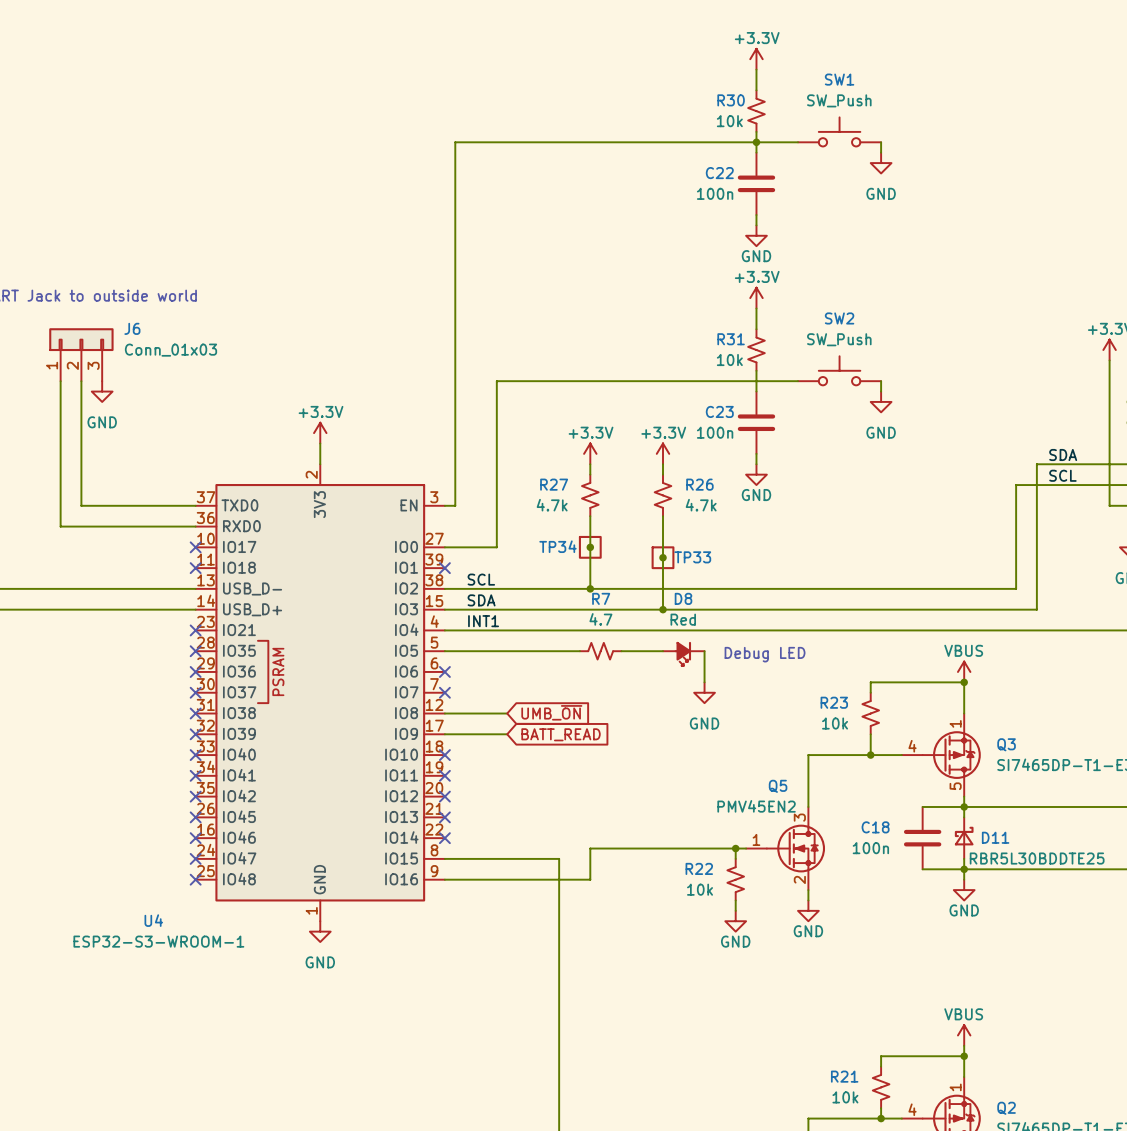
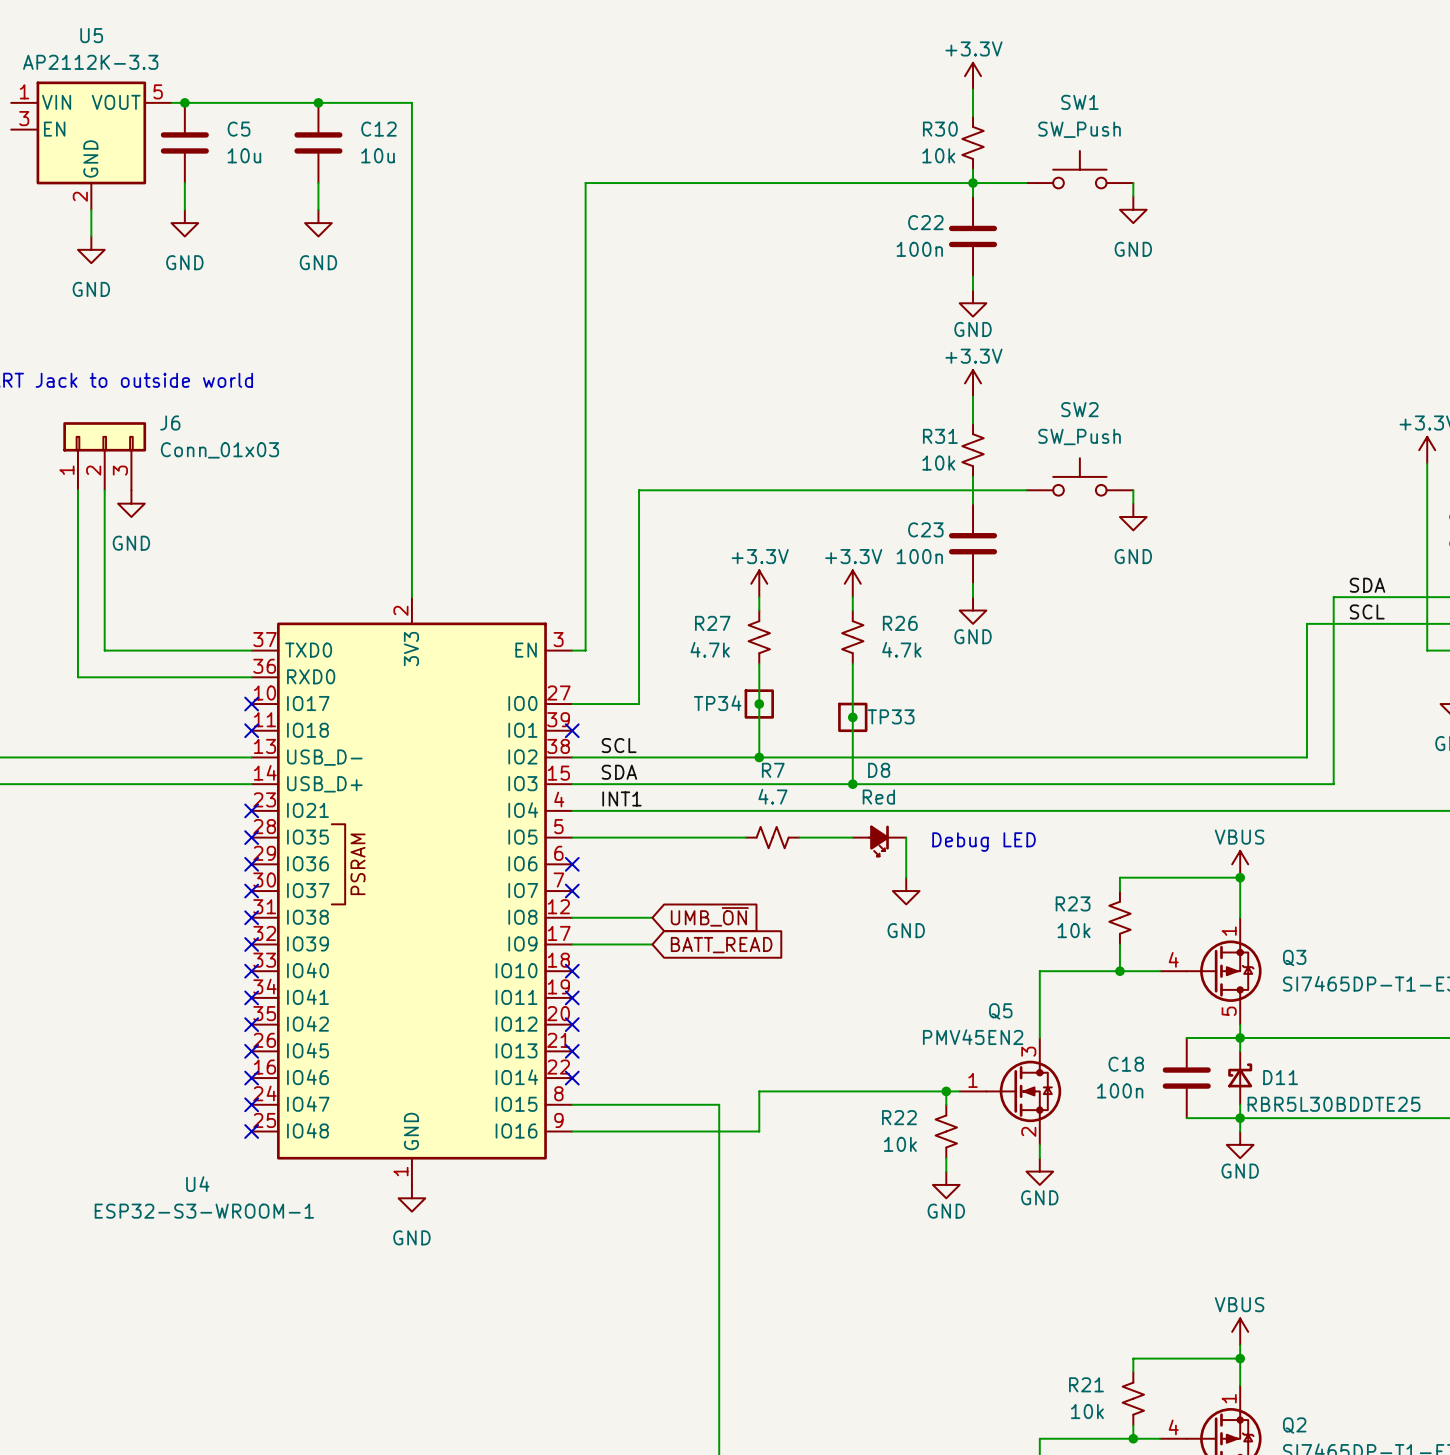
wire: none -> (171, 102) (411, 102) (411, 570)
junction: none -> (184, 102)
junction: none -> (318, 102)
C5: none -> 10u (184, 142)
C12: none -> 10u (318, 142)
U5: none -> AP2112K-3.3 (91, 145)
wire: none -> (184, 183) (184, 209)
wire: none -> (318, 183) (318, 209)
wire: none -> (91, 209) (91, 236)
power symbol: none -> GND (184, 223)
power symbol: none -> GND (318, 223)
power symbol: none -> GND (91, 249)
power symbol: +3.3V (320, 433) -> none

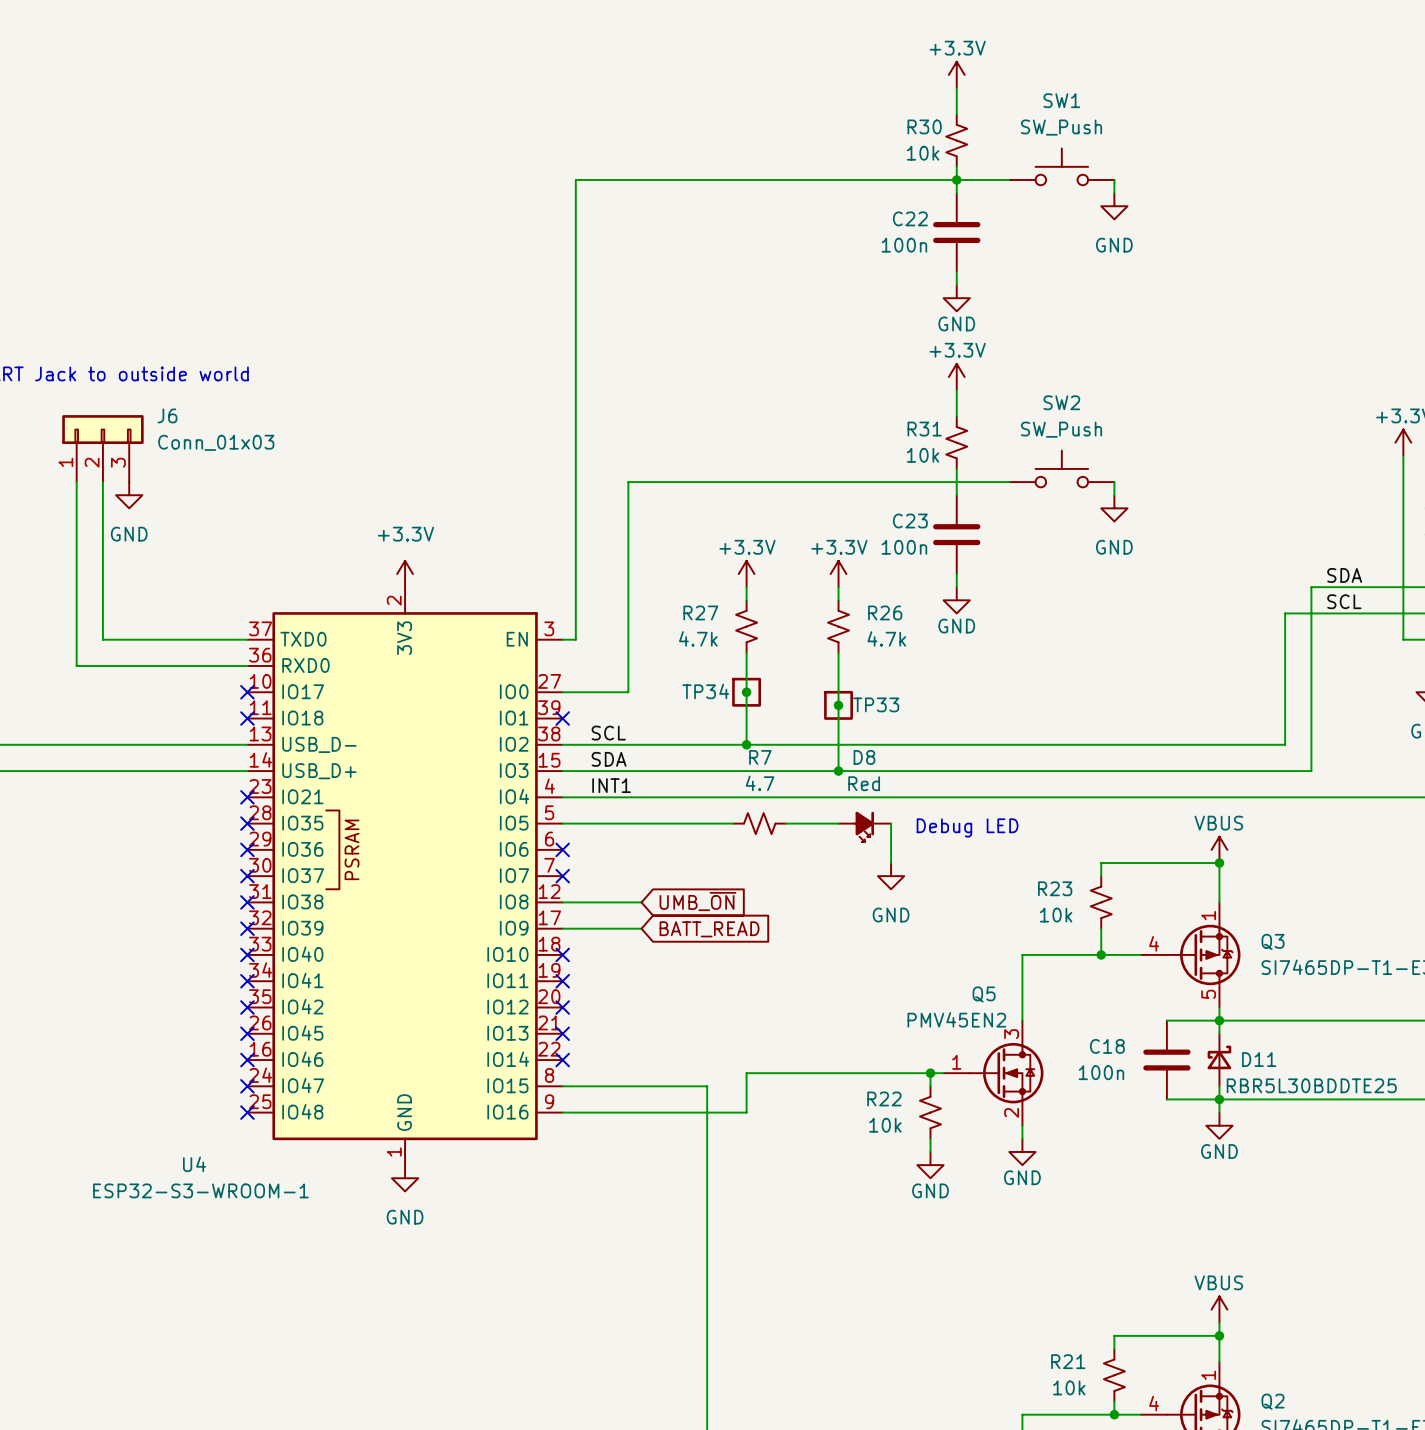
wire: (171, 102) (411, 102) (411, 597) -> none
junction: (184, 102) -> none
junction: (318, 102) -> none
C5: 10u (184, 142) -> none
C12: 10u (318, 142) -> none
U5: AP2112K-3.3 (91, 145) -> none
wire: (184, 183) (184, 209) -> none
wire: (318, 183) (318, 209) -> none
wire: (91, 209) (91, 236) -> none
power symbol: GND (184, 223) -> none
power symbol: GND (318, 223) -> none
power symbol: GND (91, 249) -> none
power symbol: none -> +3.3V (405, 574)

